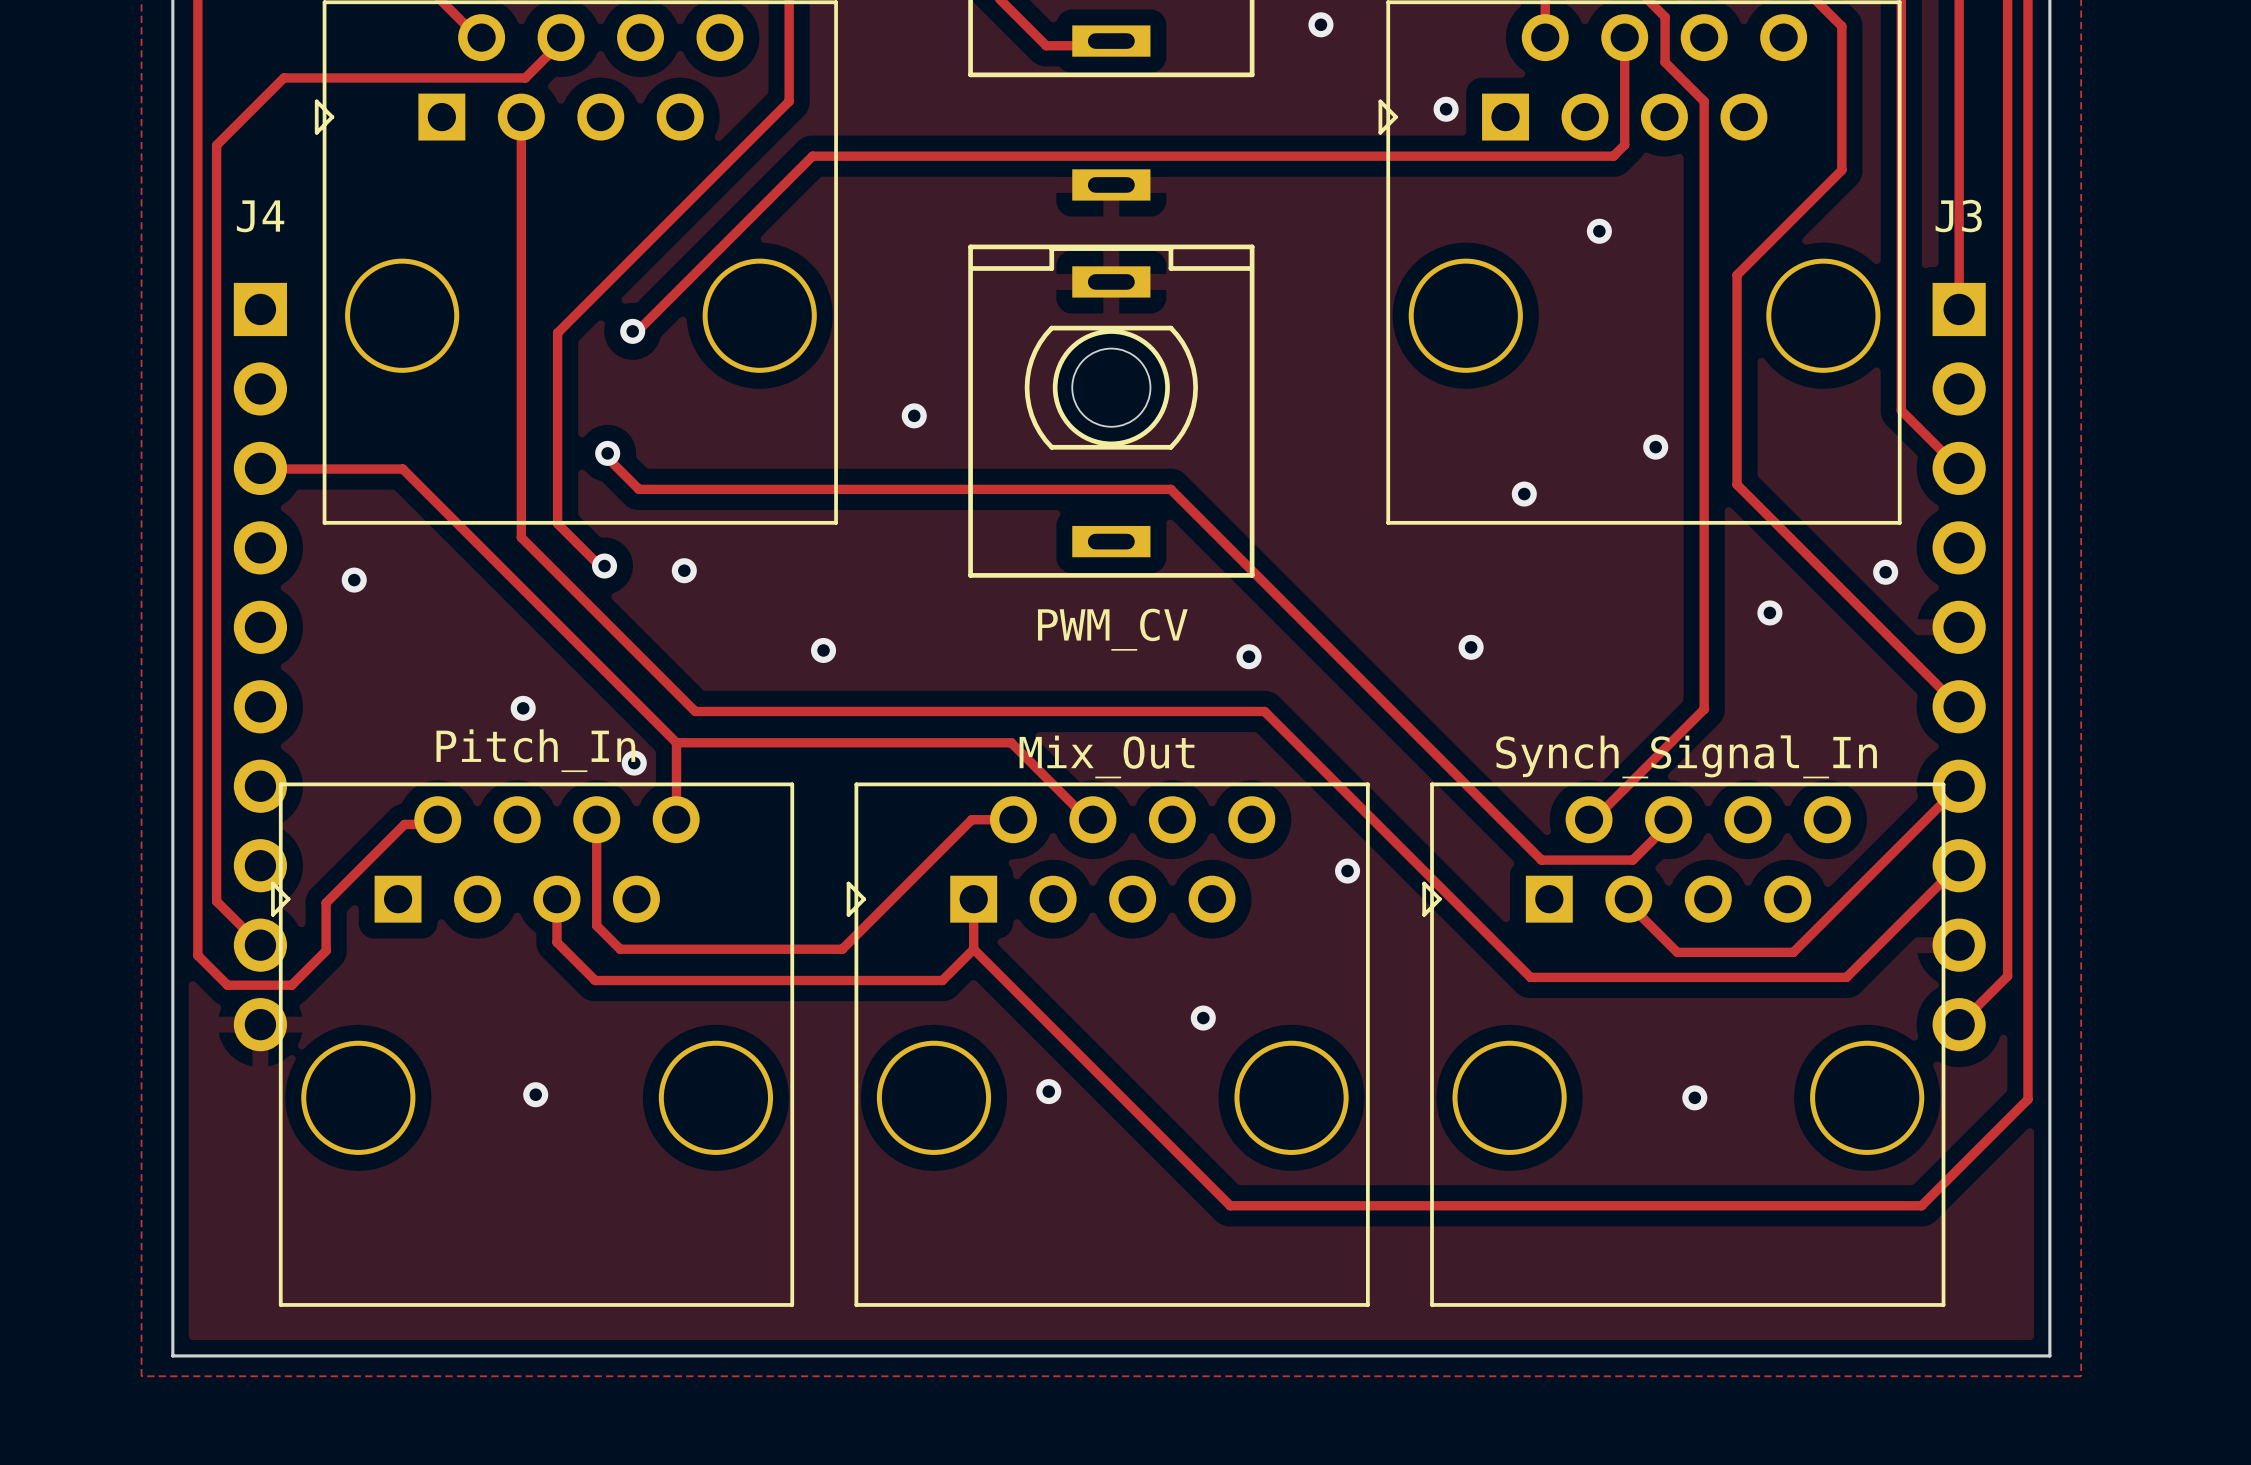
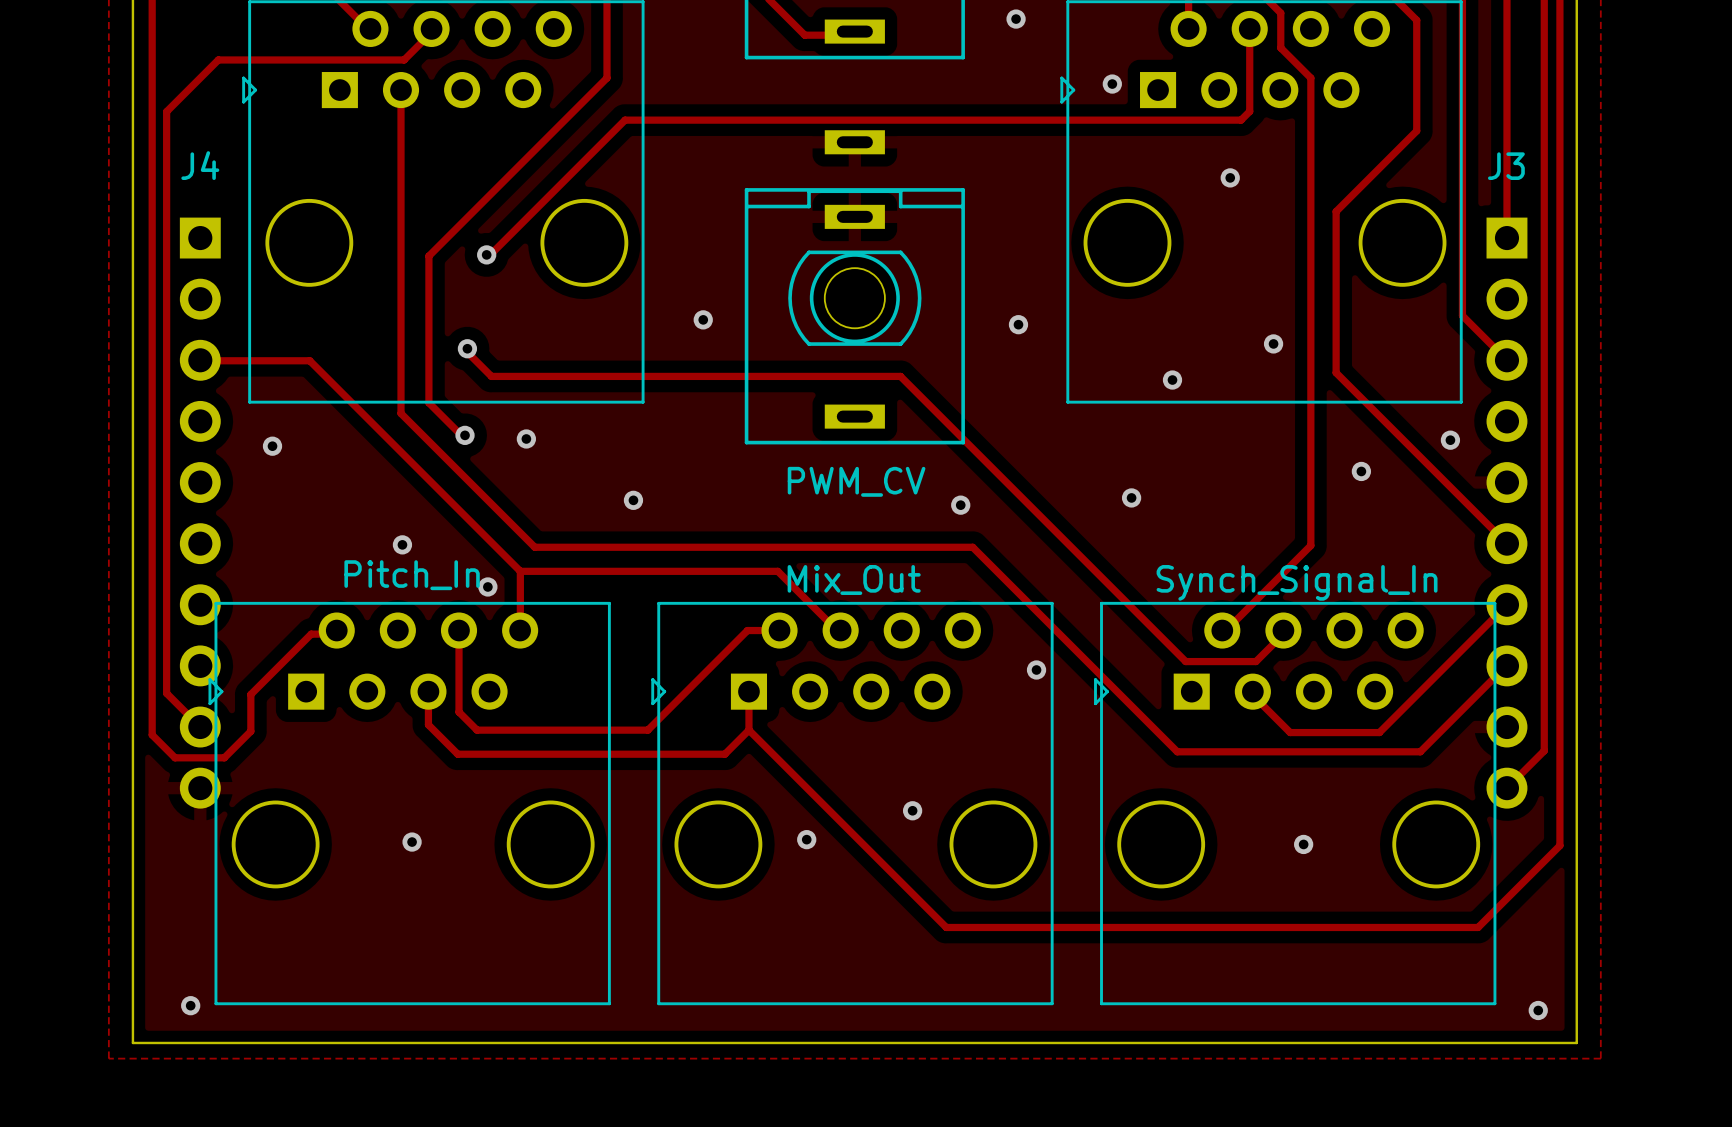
via: none -> (1018, 324)
via position: (1203, 1018) -> (912, 810)
via: none -> (190, 1005)
via: none -> (1538, 1010)

